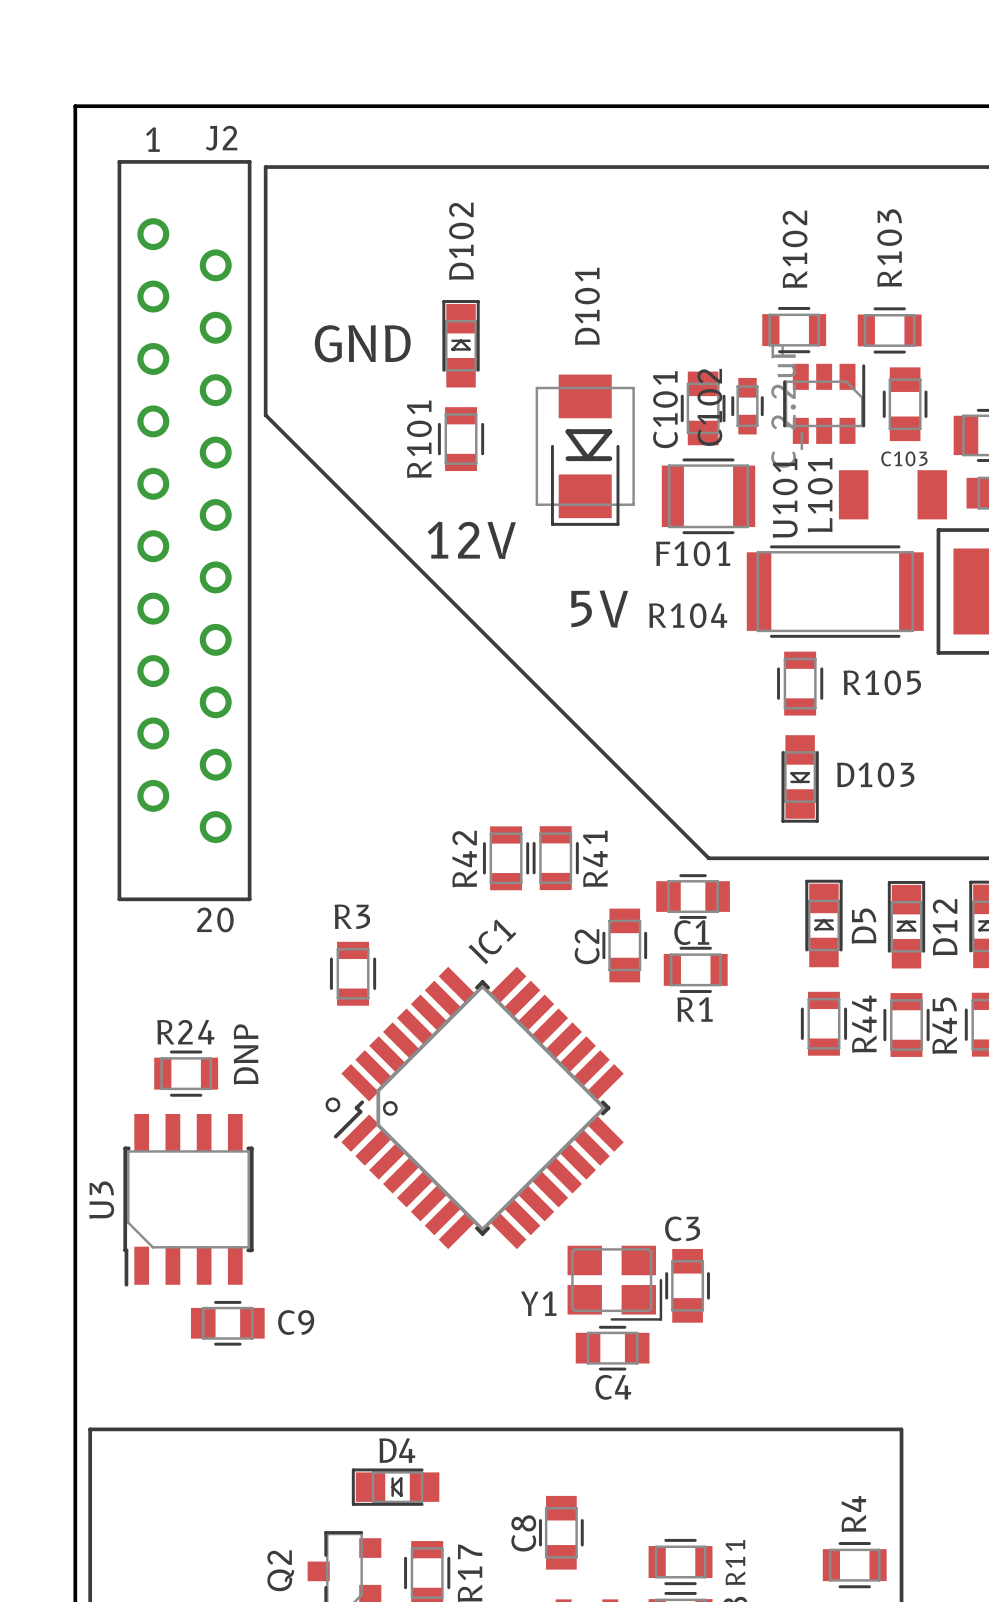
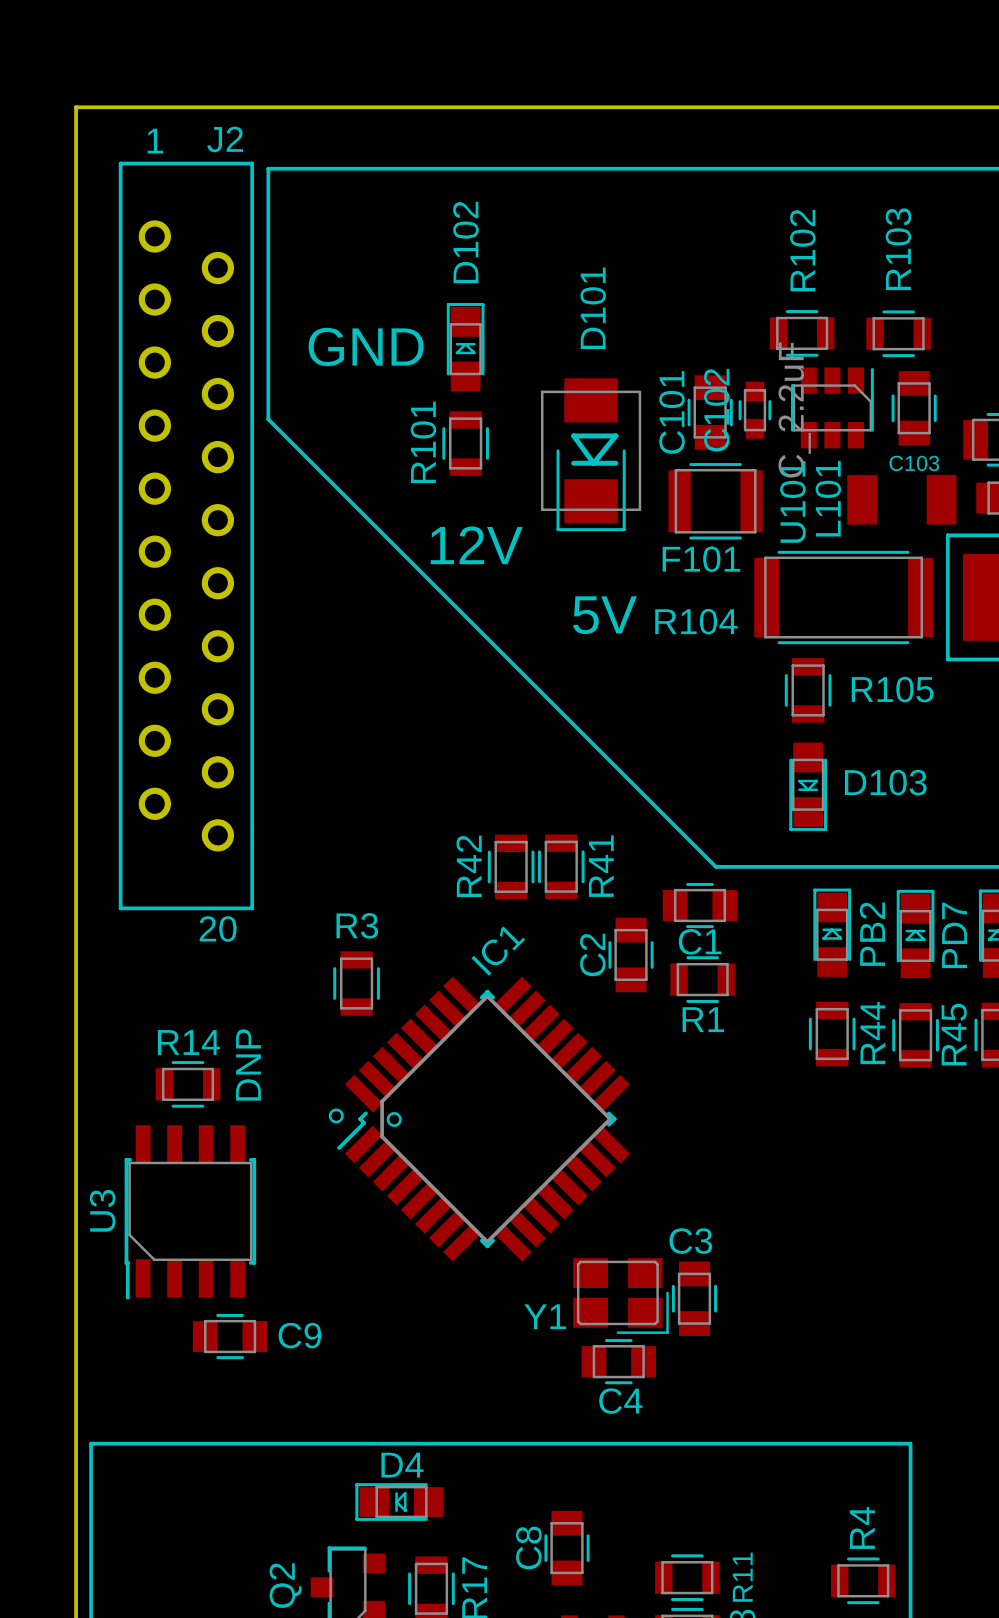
D5 name: D5 (864, 926) -> PB2 (872, 934)
D12 name: D12 (945, 927) -> PD7 (954, 935)
R24 name: R24 (185, 1032) -> R14 (188, 1042)

